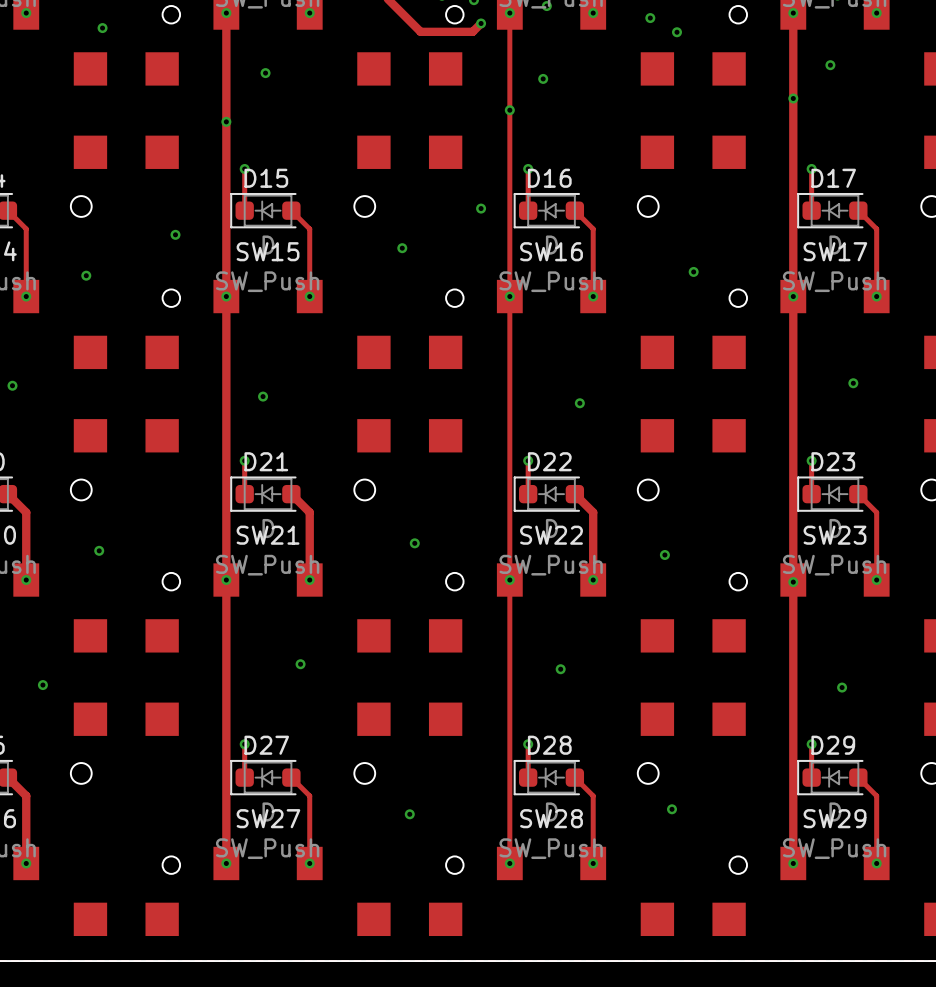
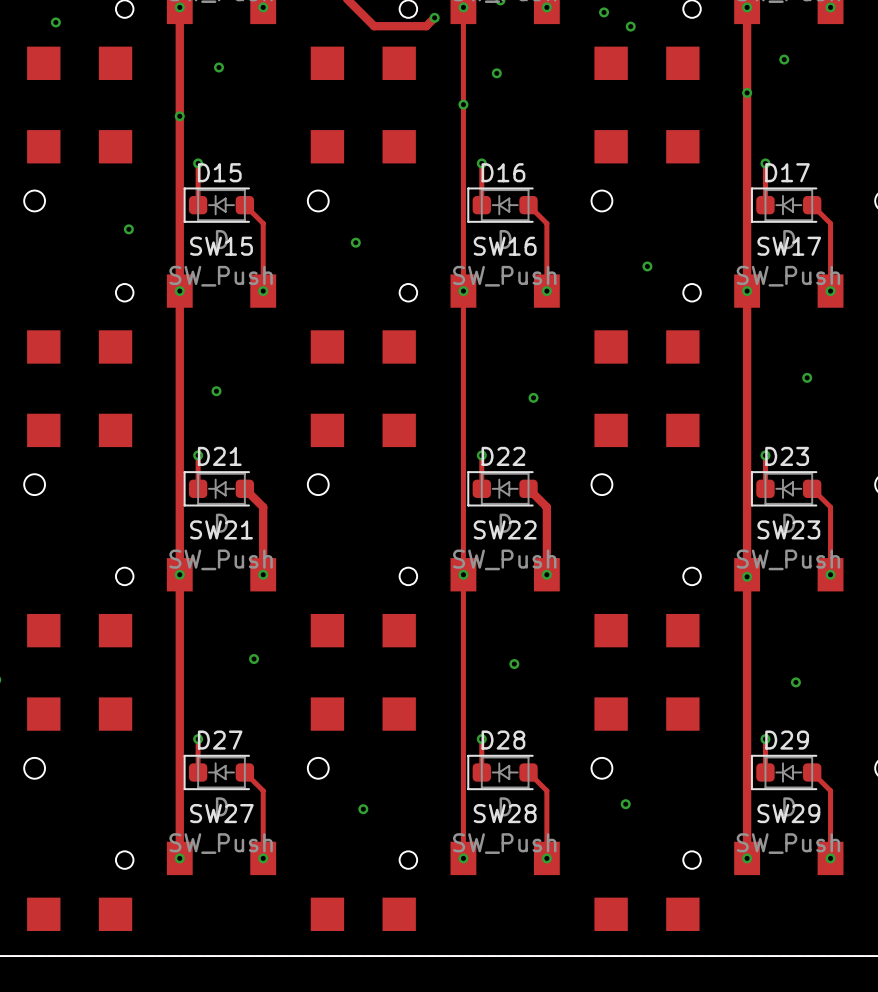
via: (481, 208) -> none
via: (86, 275) -> none
via: (414, 543) -> none
via: (99, 550) -> none
via: (664, 554) -> none

